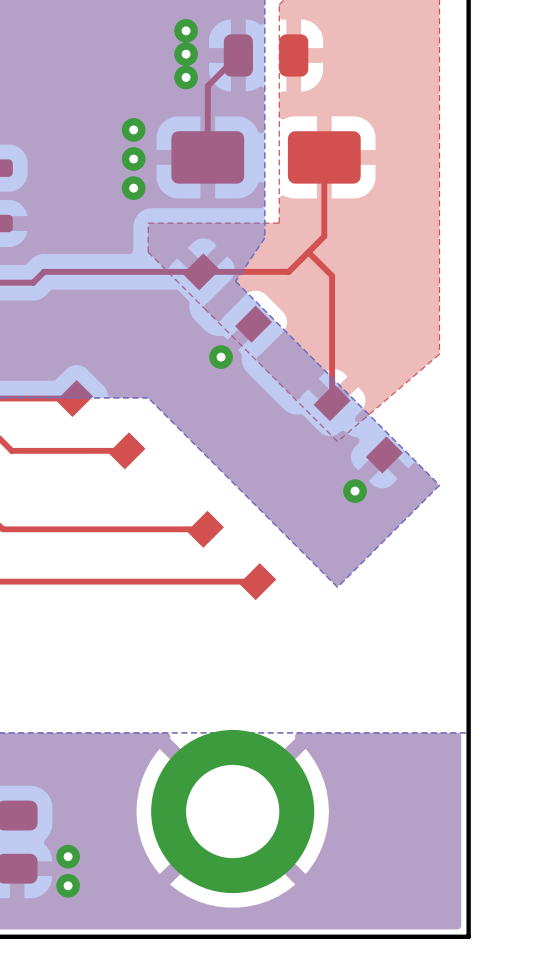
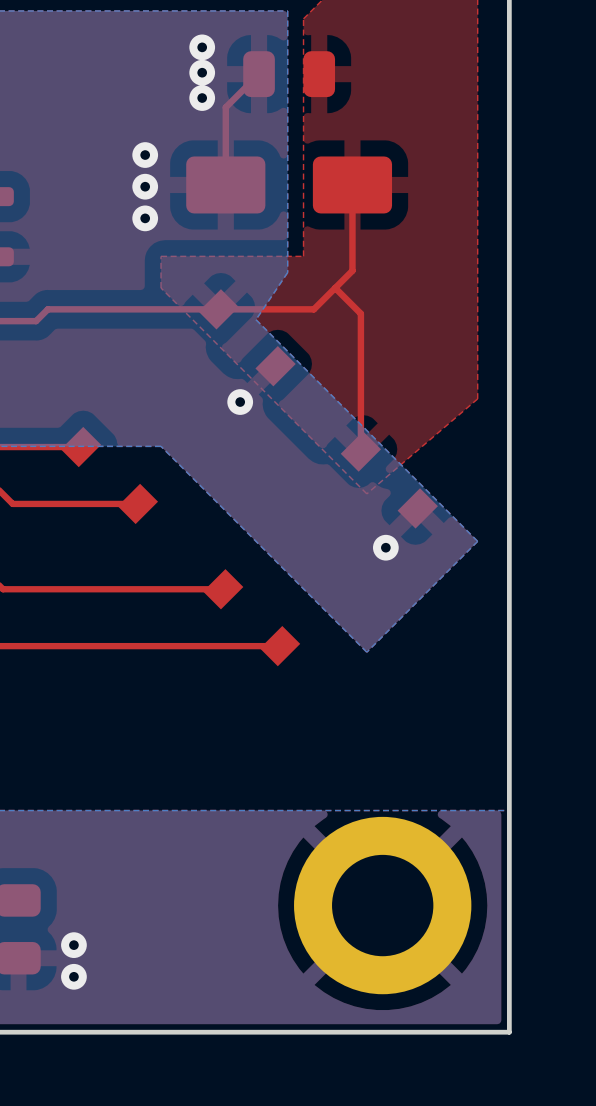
part position: (232, 811) -> (382, 905)

